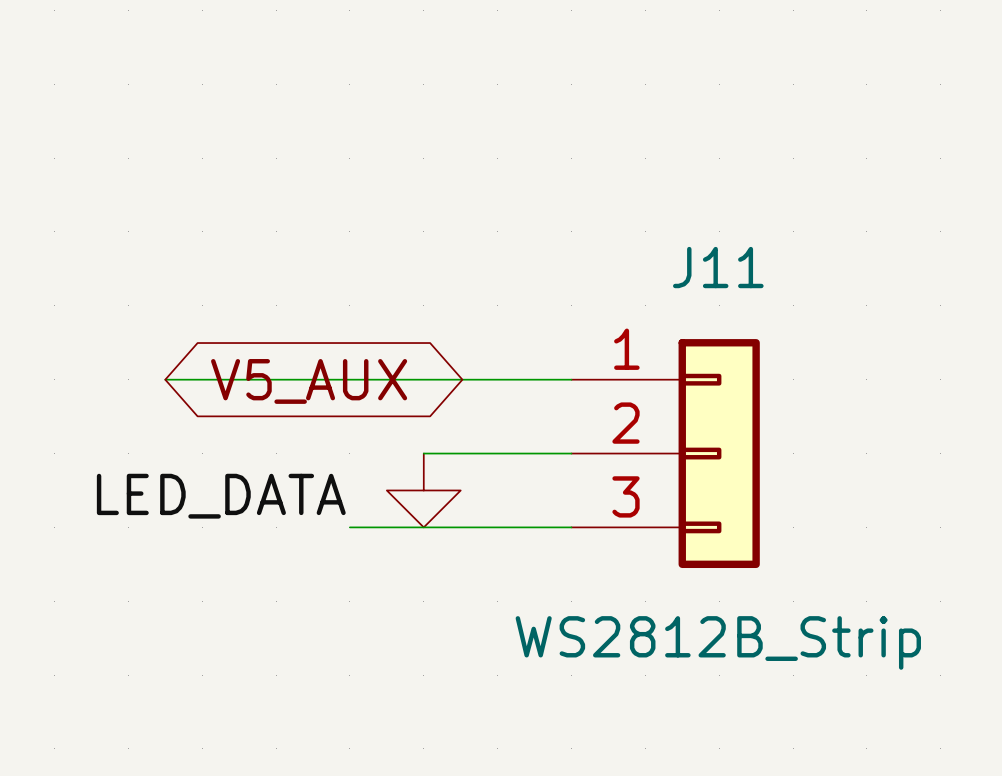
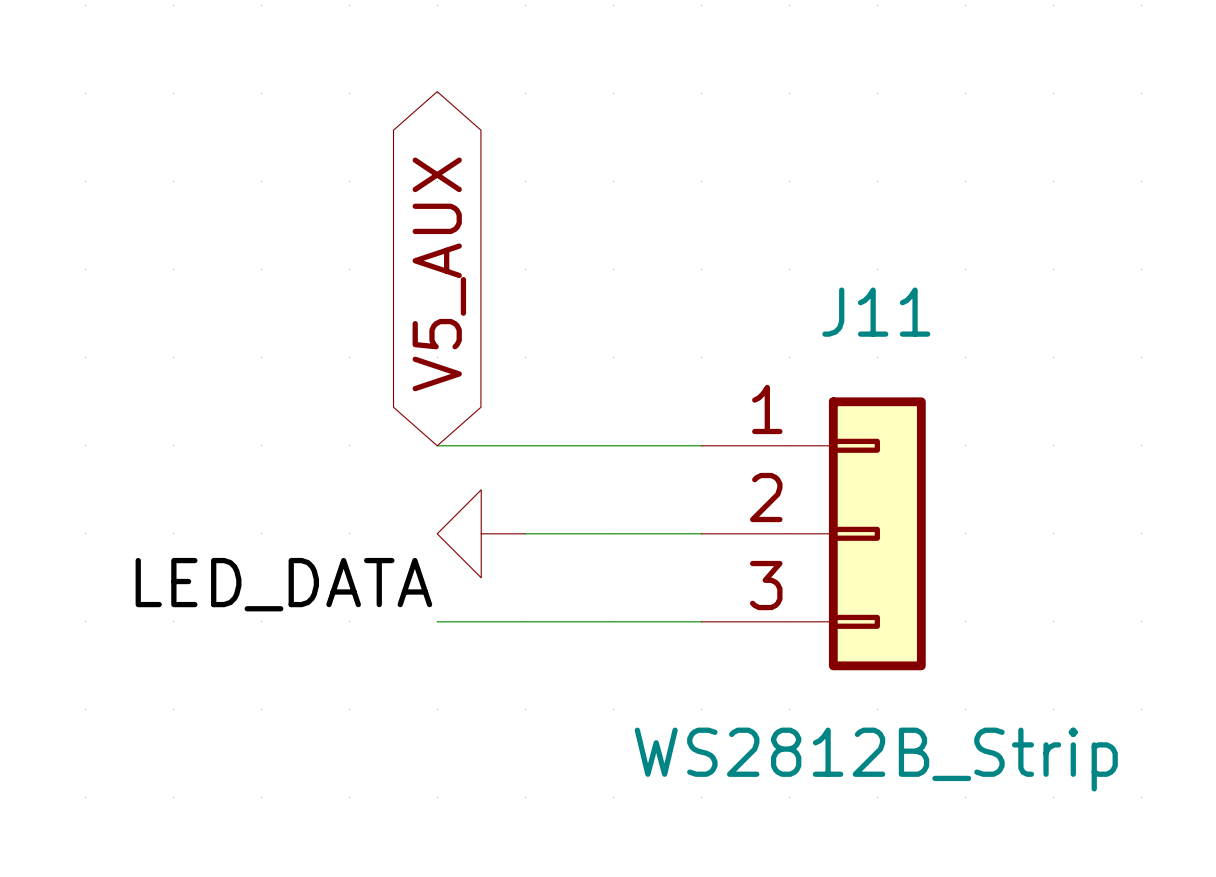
wire: (165, 379) (349, 379) -> none
global label rotation: 0° (309, 381) -> 90° counterclockwise (439, 274)
power symbol rotation: 0° (423, 490) -> 90° clockwise (481, 533)
power symbol position: (423, 490) -> (481, 533)

